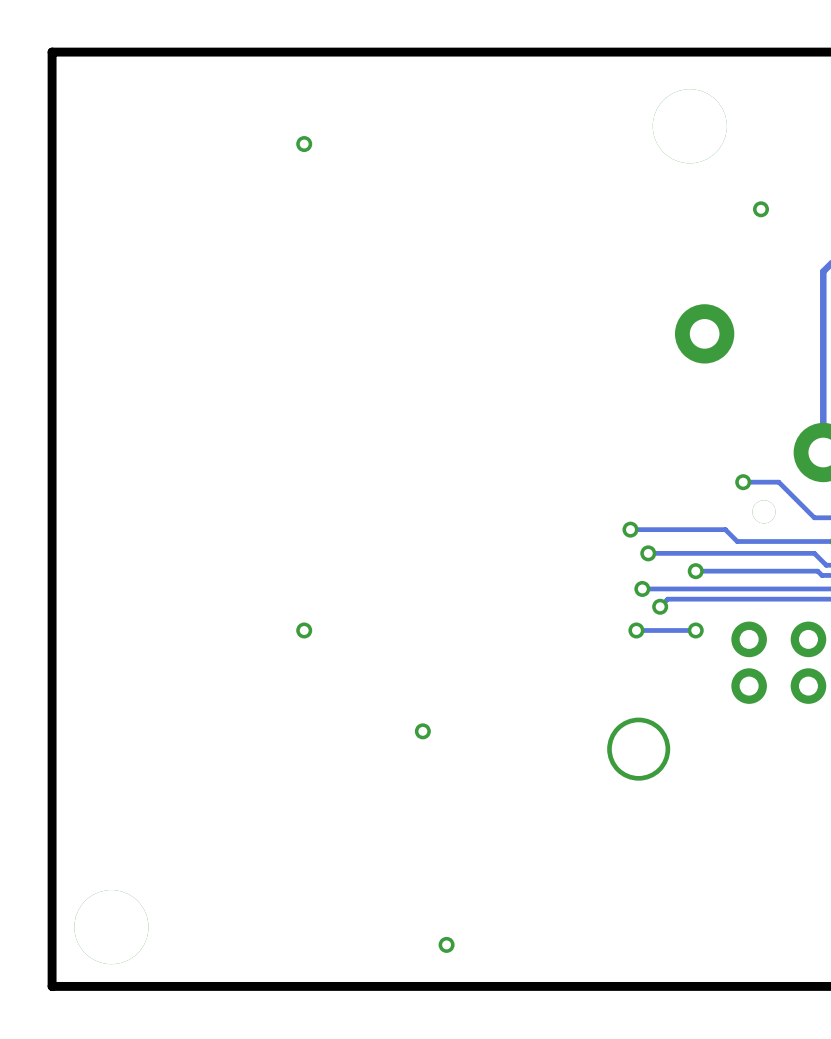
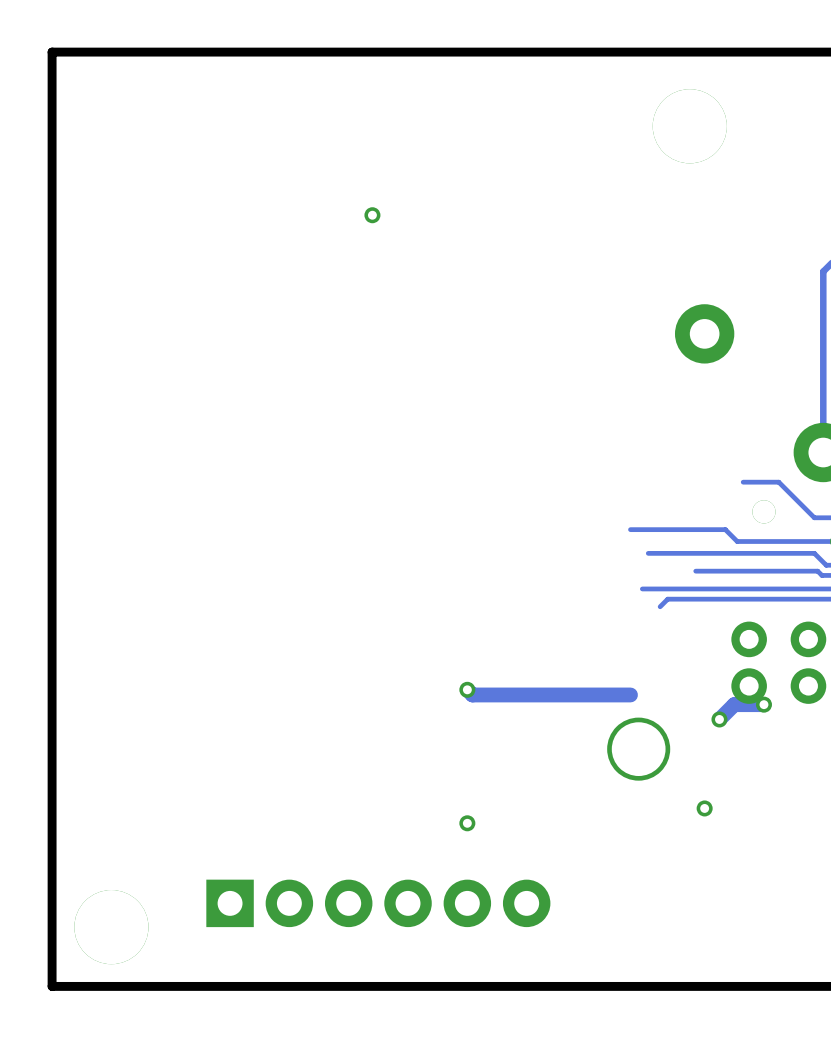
via position: (304, 144) -> (372, 215)
via: (761, 209) -> none
via: (743, 482) -> none
via: (630, 529) -> none
via: (648, 553) -> none
via: (695, 571) -> none
via: (642, 588) -> none
via: (660, 606) -> none
via: (304, 630) -> none
via: (636, 630) -> none
track: (695, 630) (636, 630) -> none
via: (695, 630) -> none
track: none -> (467, 689) (472, 694) (630, 694)
via: none -> (467, 689)
via: none -> (763, 704)
track: none -> (766, 704) (734, 704) (719, 719)
via: none -> (719, 719)
via: (422, 731) -> none
via: none -> (704, 808)
via: none -> (467, 823)
part: none -> (378, 903)
via: (446, 944) -> none

